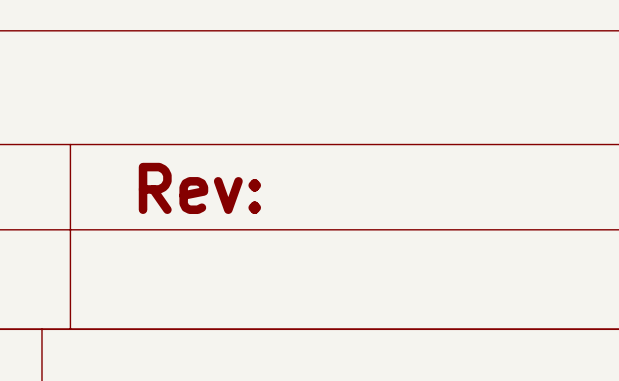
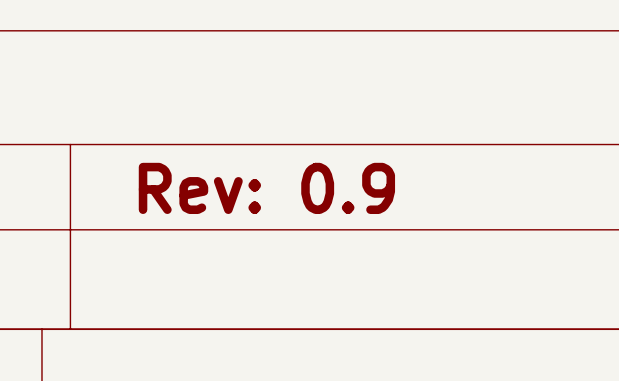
title block: Rev: (199, 188) -> Rev: 0.9 (266, 188)

